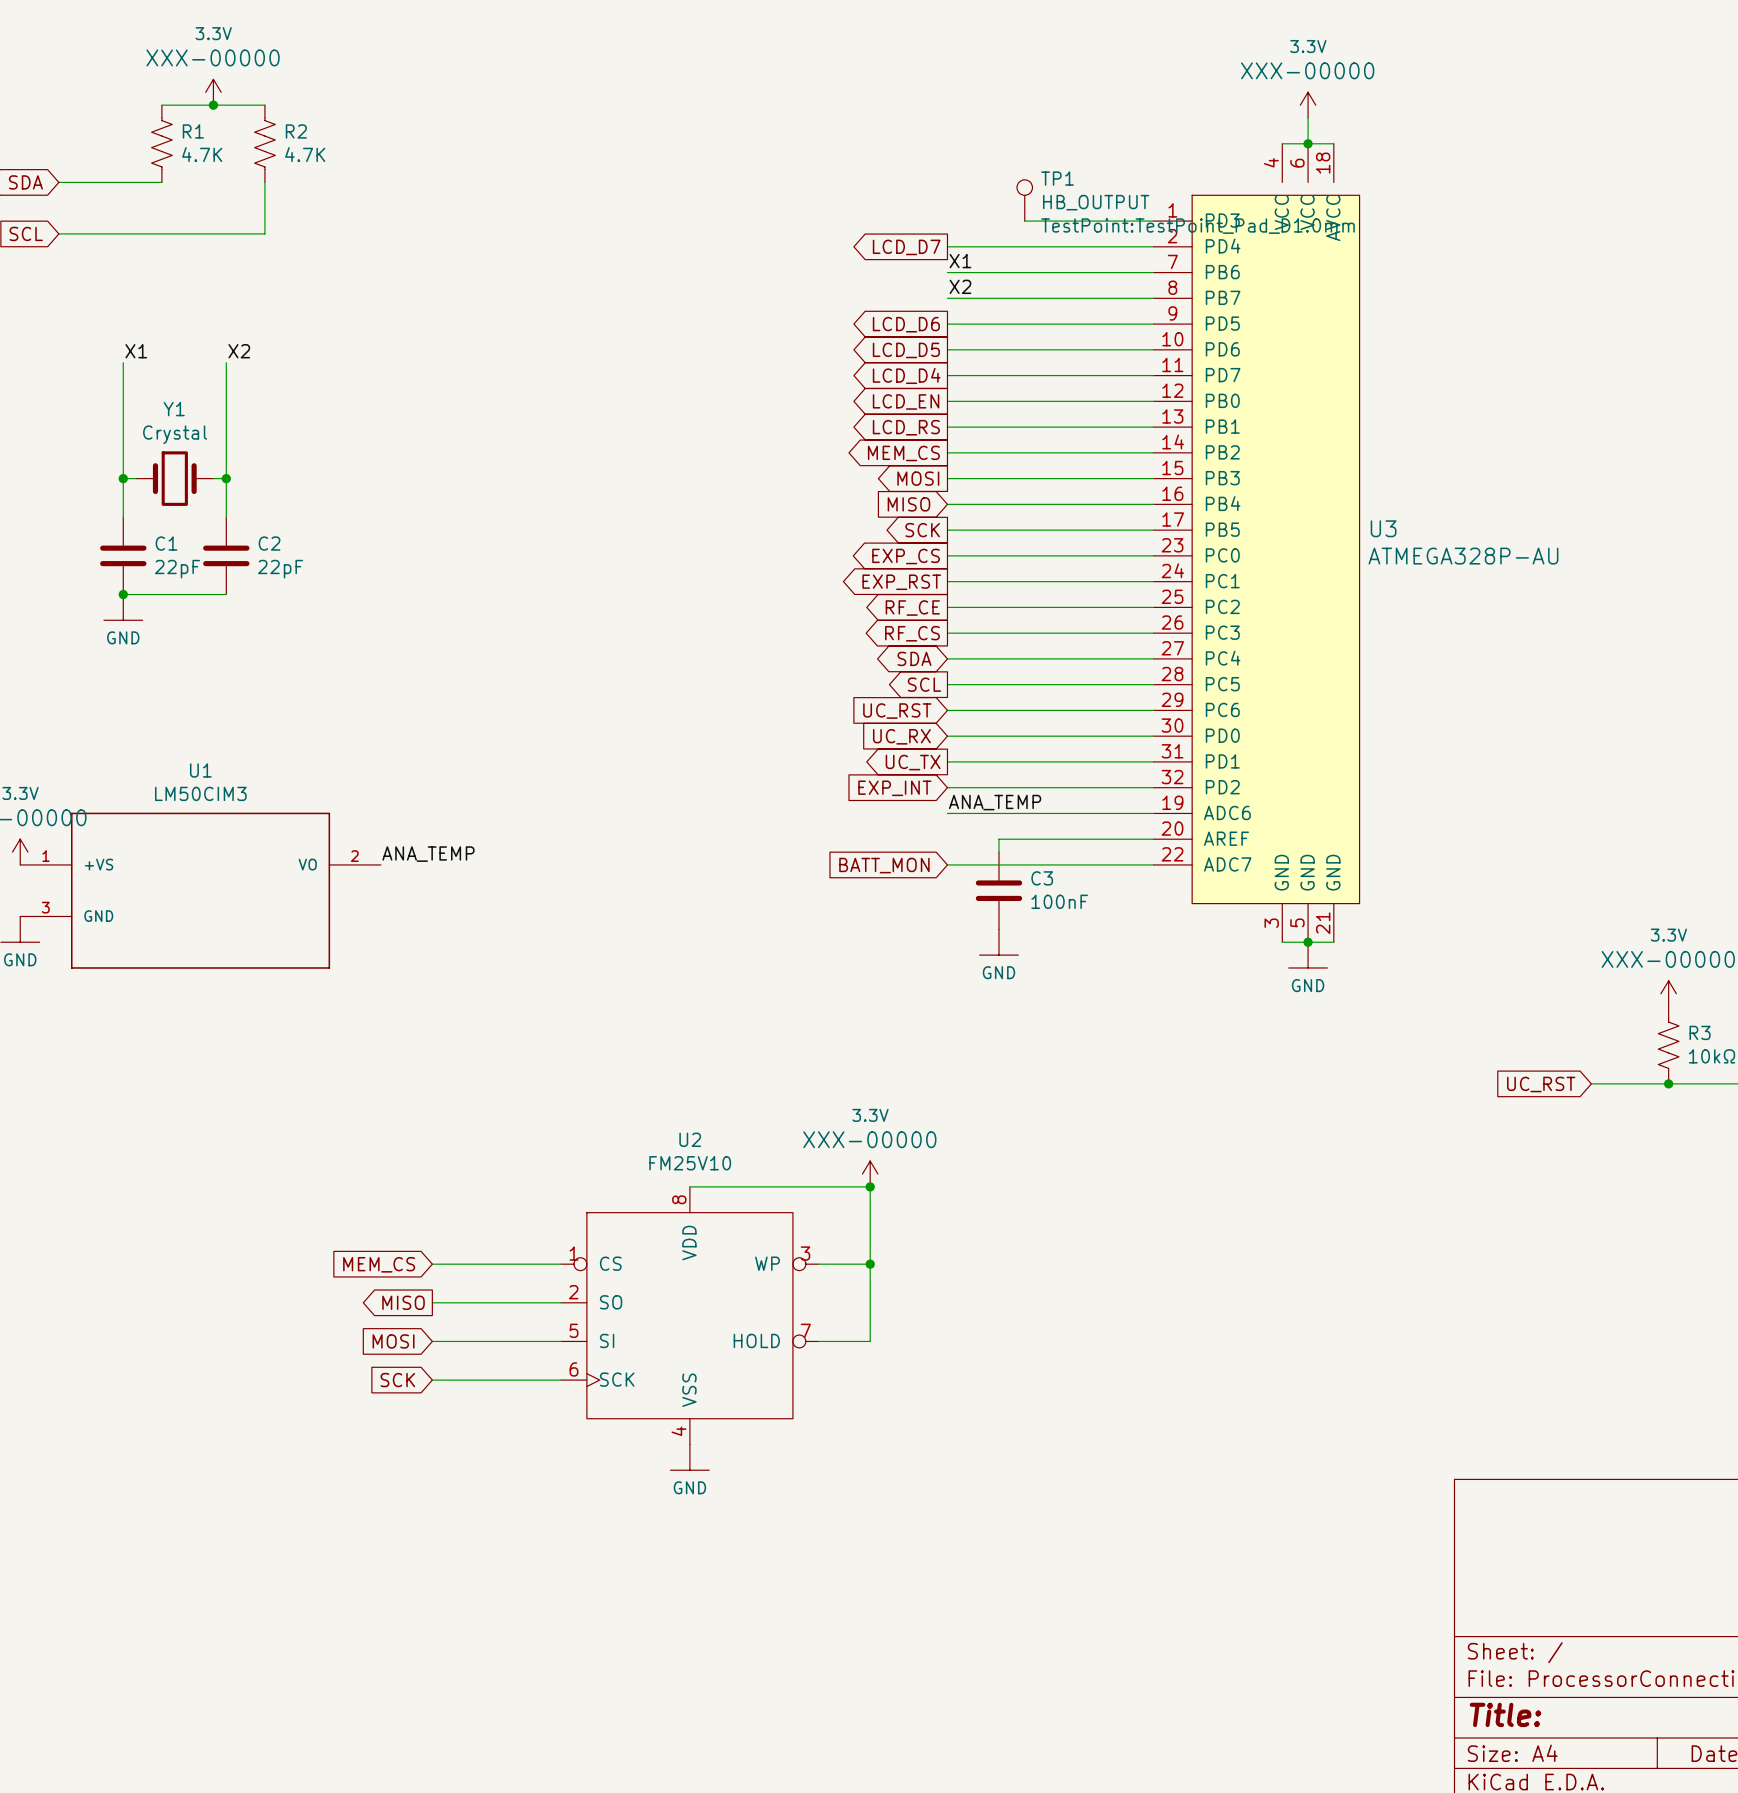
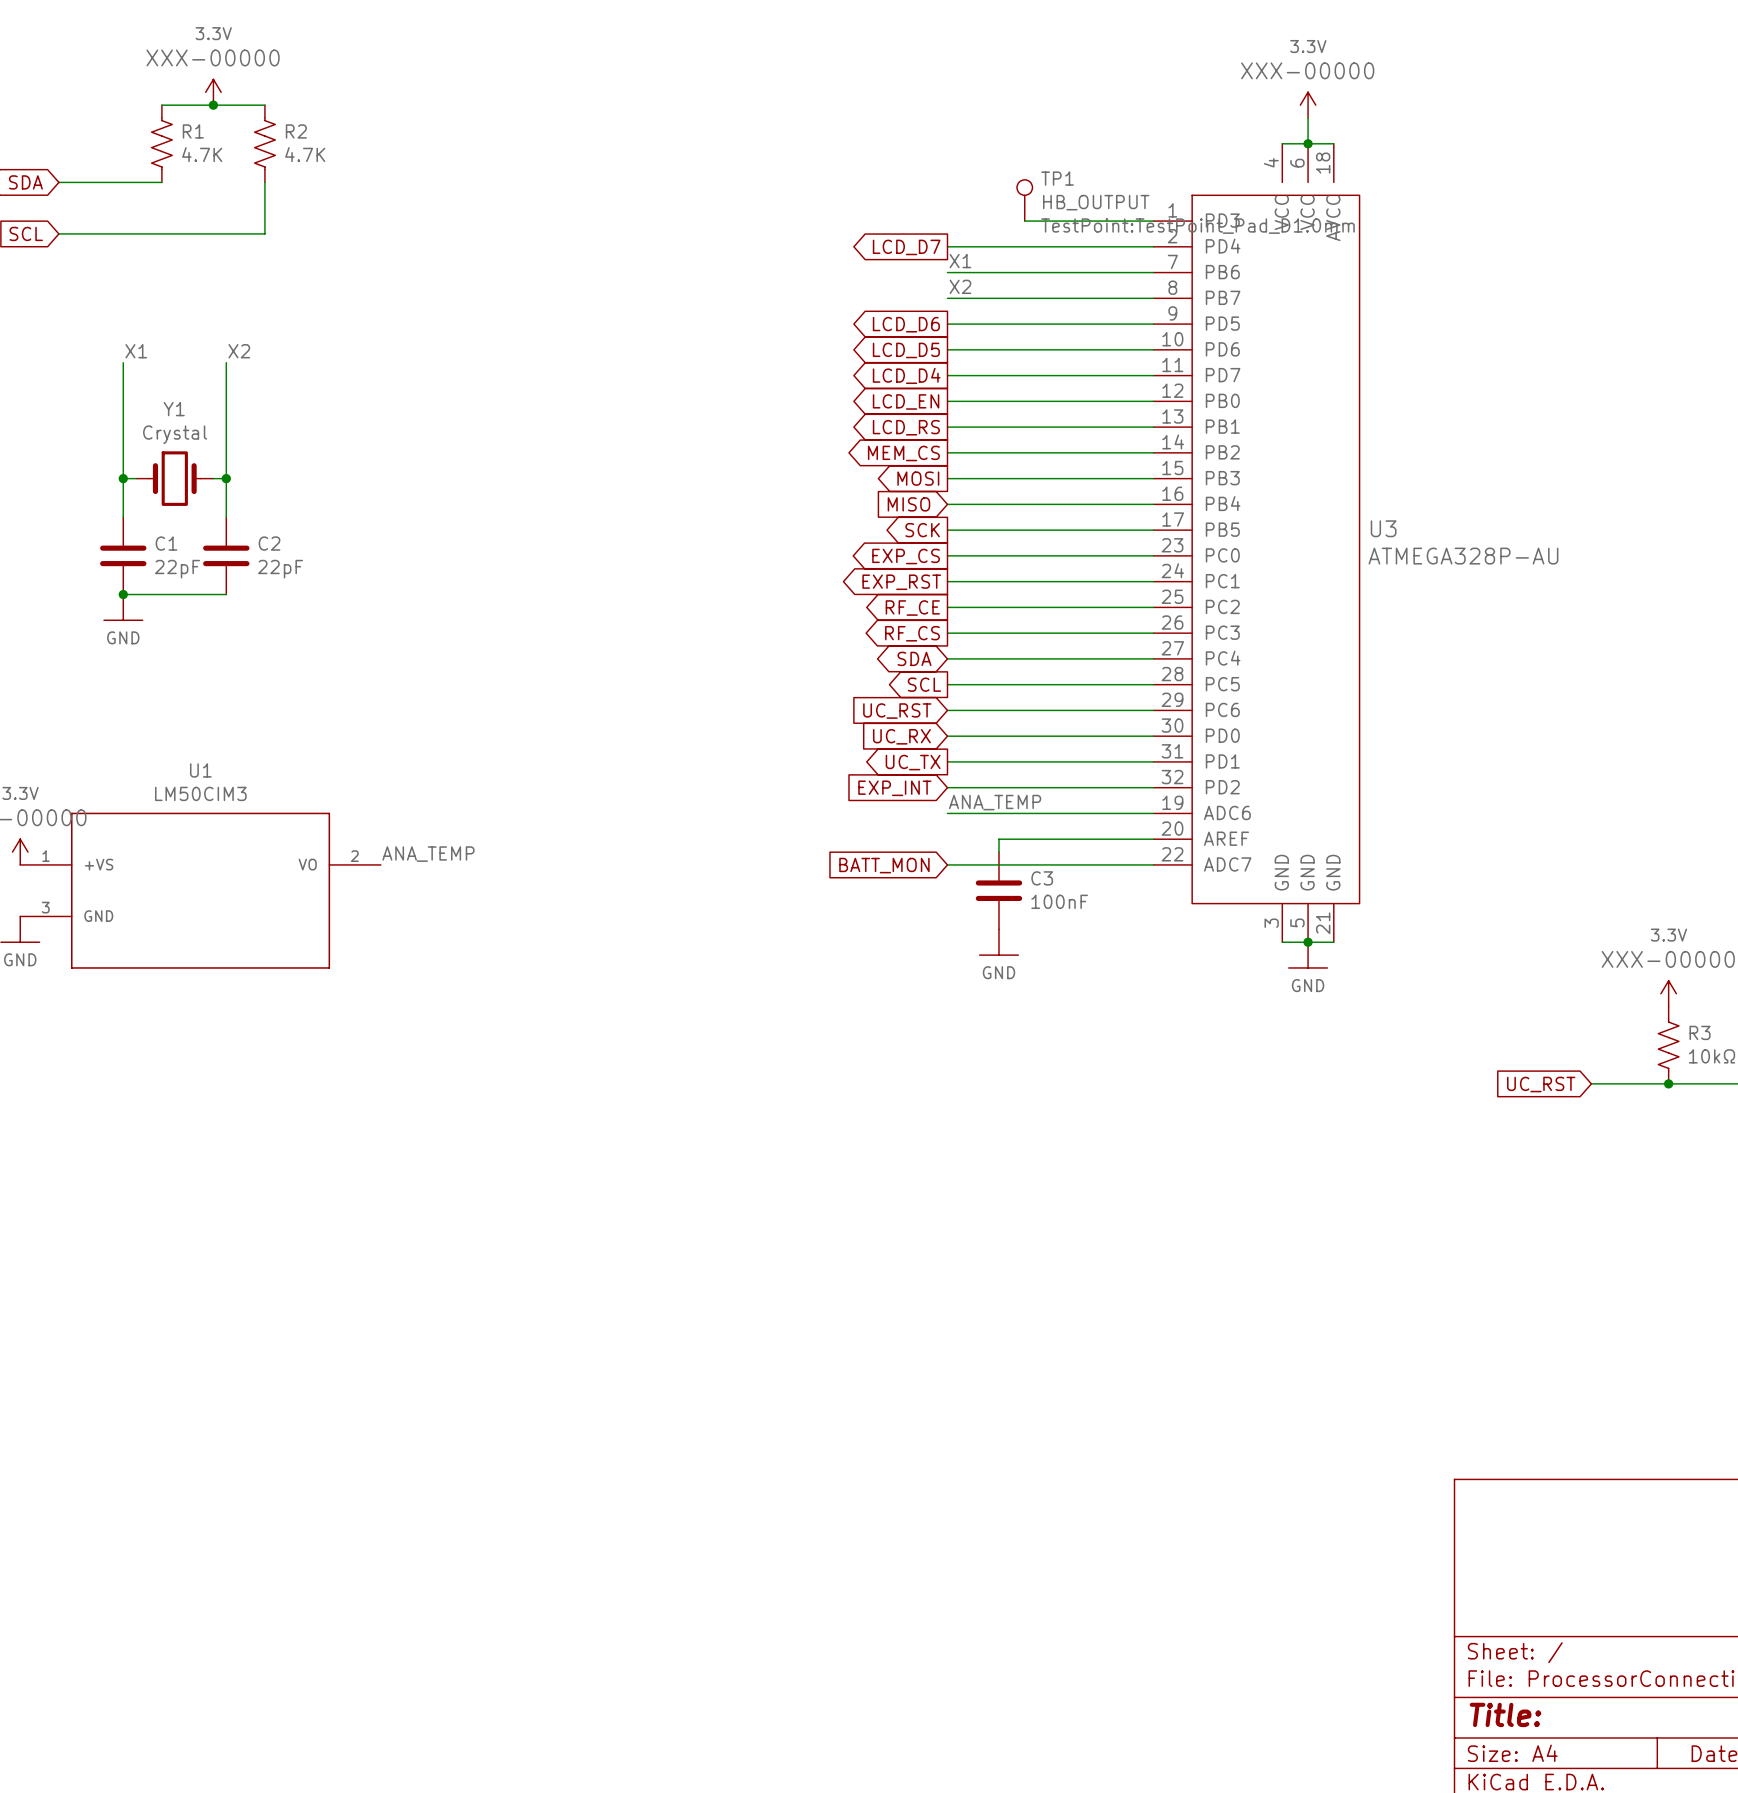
power symbol: 3.3V (870, 1174) -> none
wire: (689, 1186) (870, 1186) (870, 1341) (818, 1341) -> none
junction: (870, 1186) -> none
global label: MEM_CS (379, 1264) -> none
wire: (432, 1264) (561, 1264) -> none
wire: (818, 1264) (870, 1264) -> none
junction: (870, 1264) -> none
global label: MISO (403, 1302) -> none
wire: (432, 1302) (561, 1302) -> none
U2: FM25V10 (689, 1315) -> none
global label: MOSI (393, 1341) -> none
wire: (432, 1341) (561, 1341) -> none
global label: SCK (397, 1380) -> none
wire: (432, 1380) (561, 1380) -> none
power symbol: GND (689, 1457) -> none

